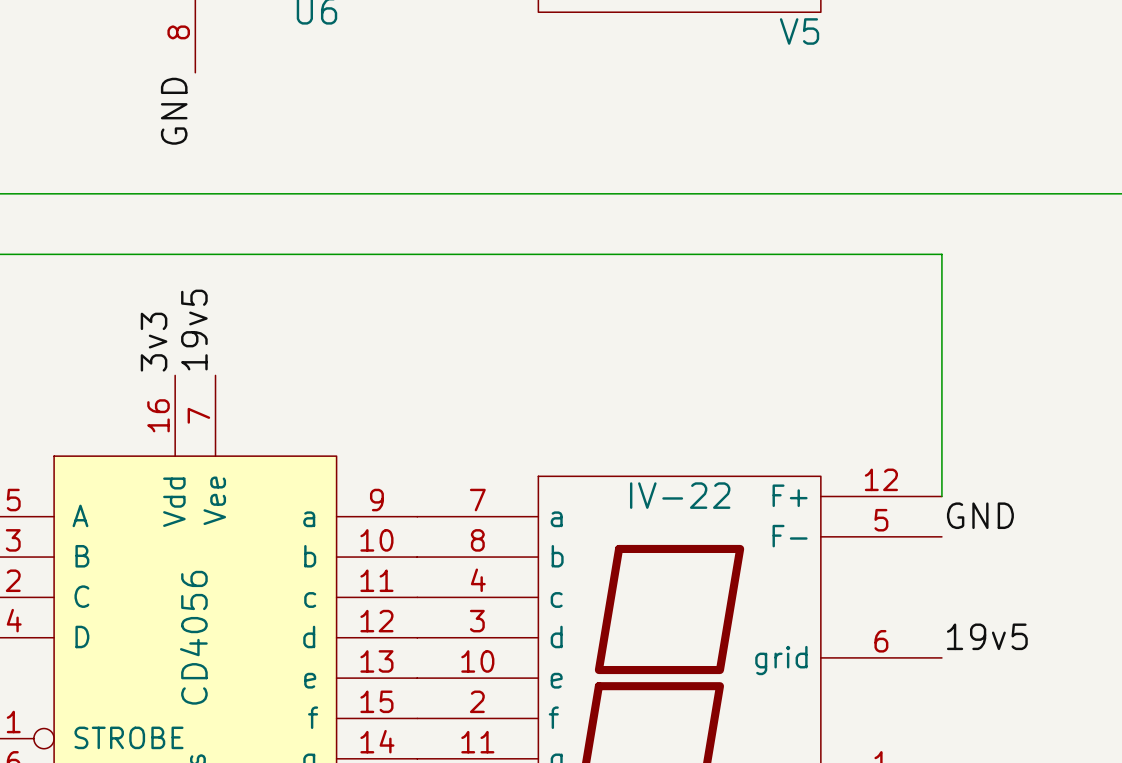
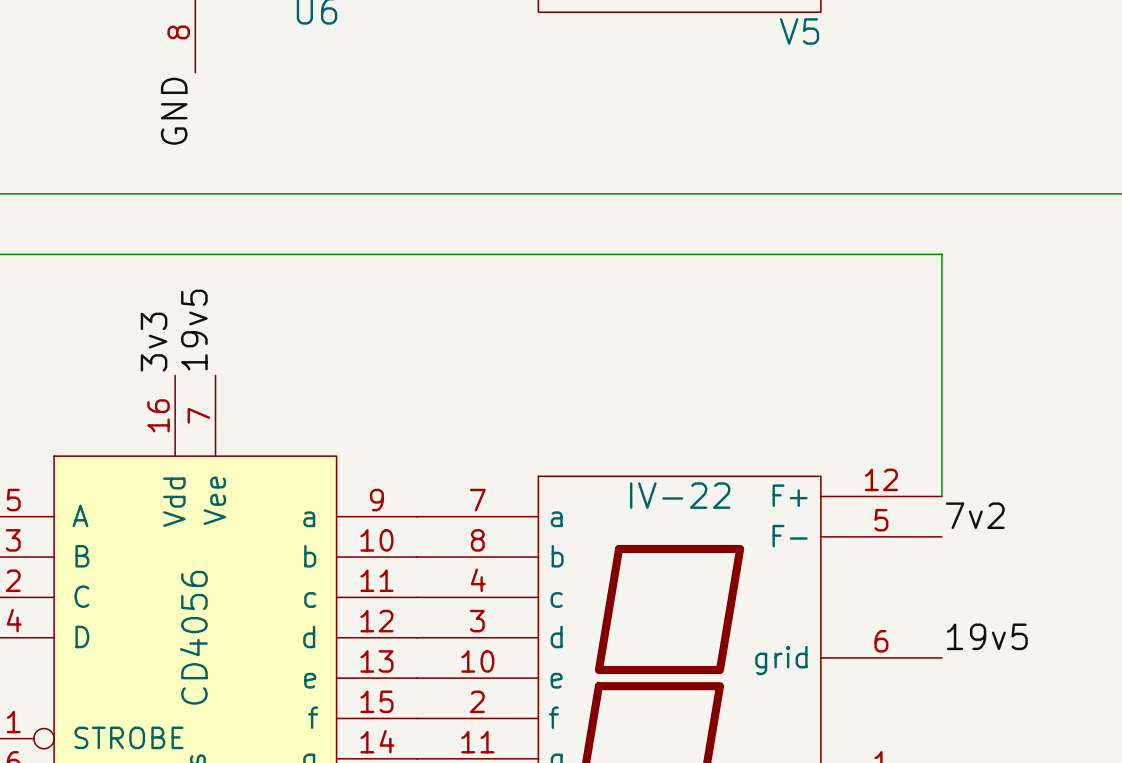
label: GND (980, 515) -> 7v2 (975, 515)

